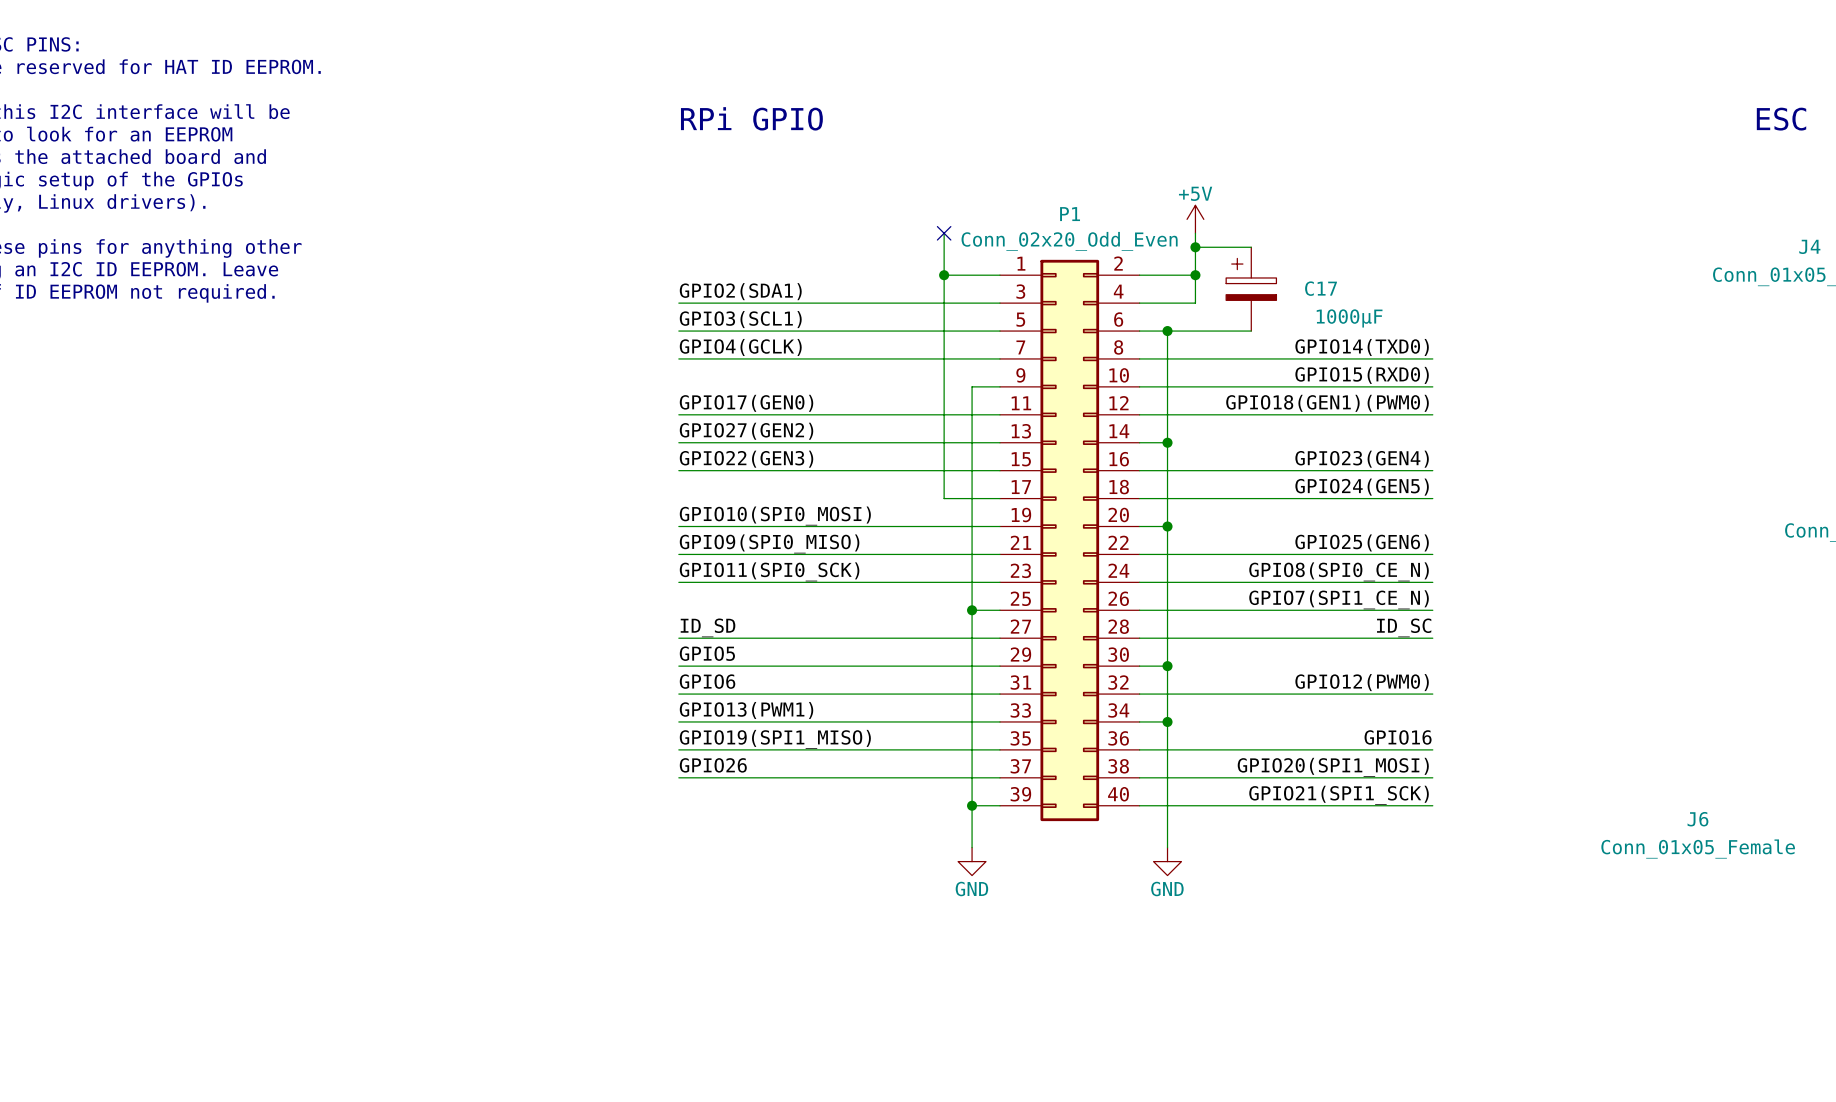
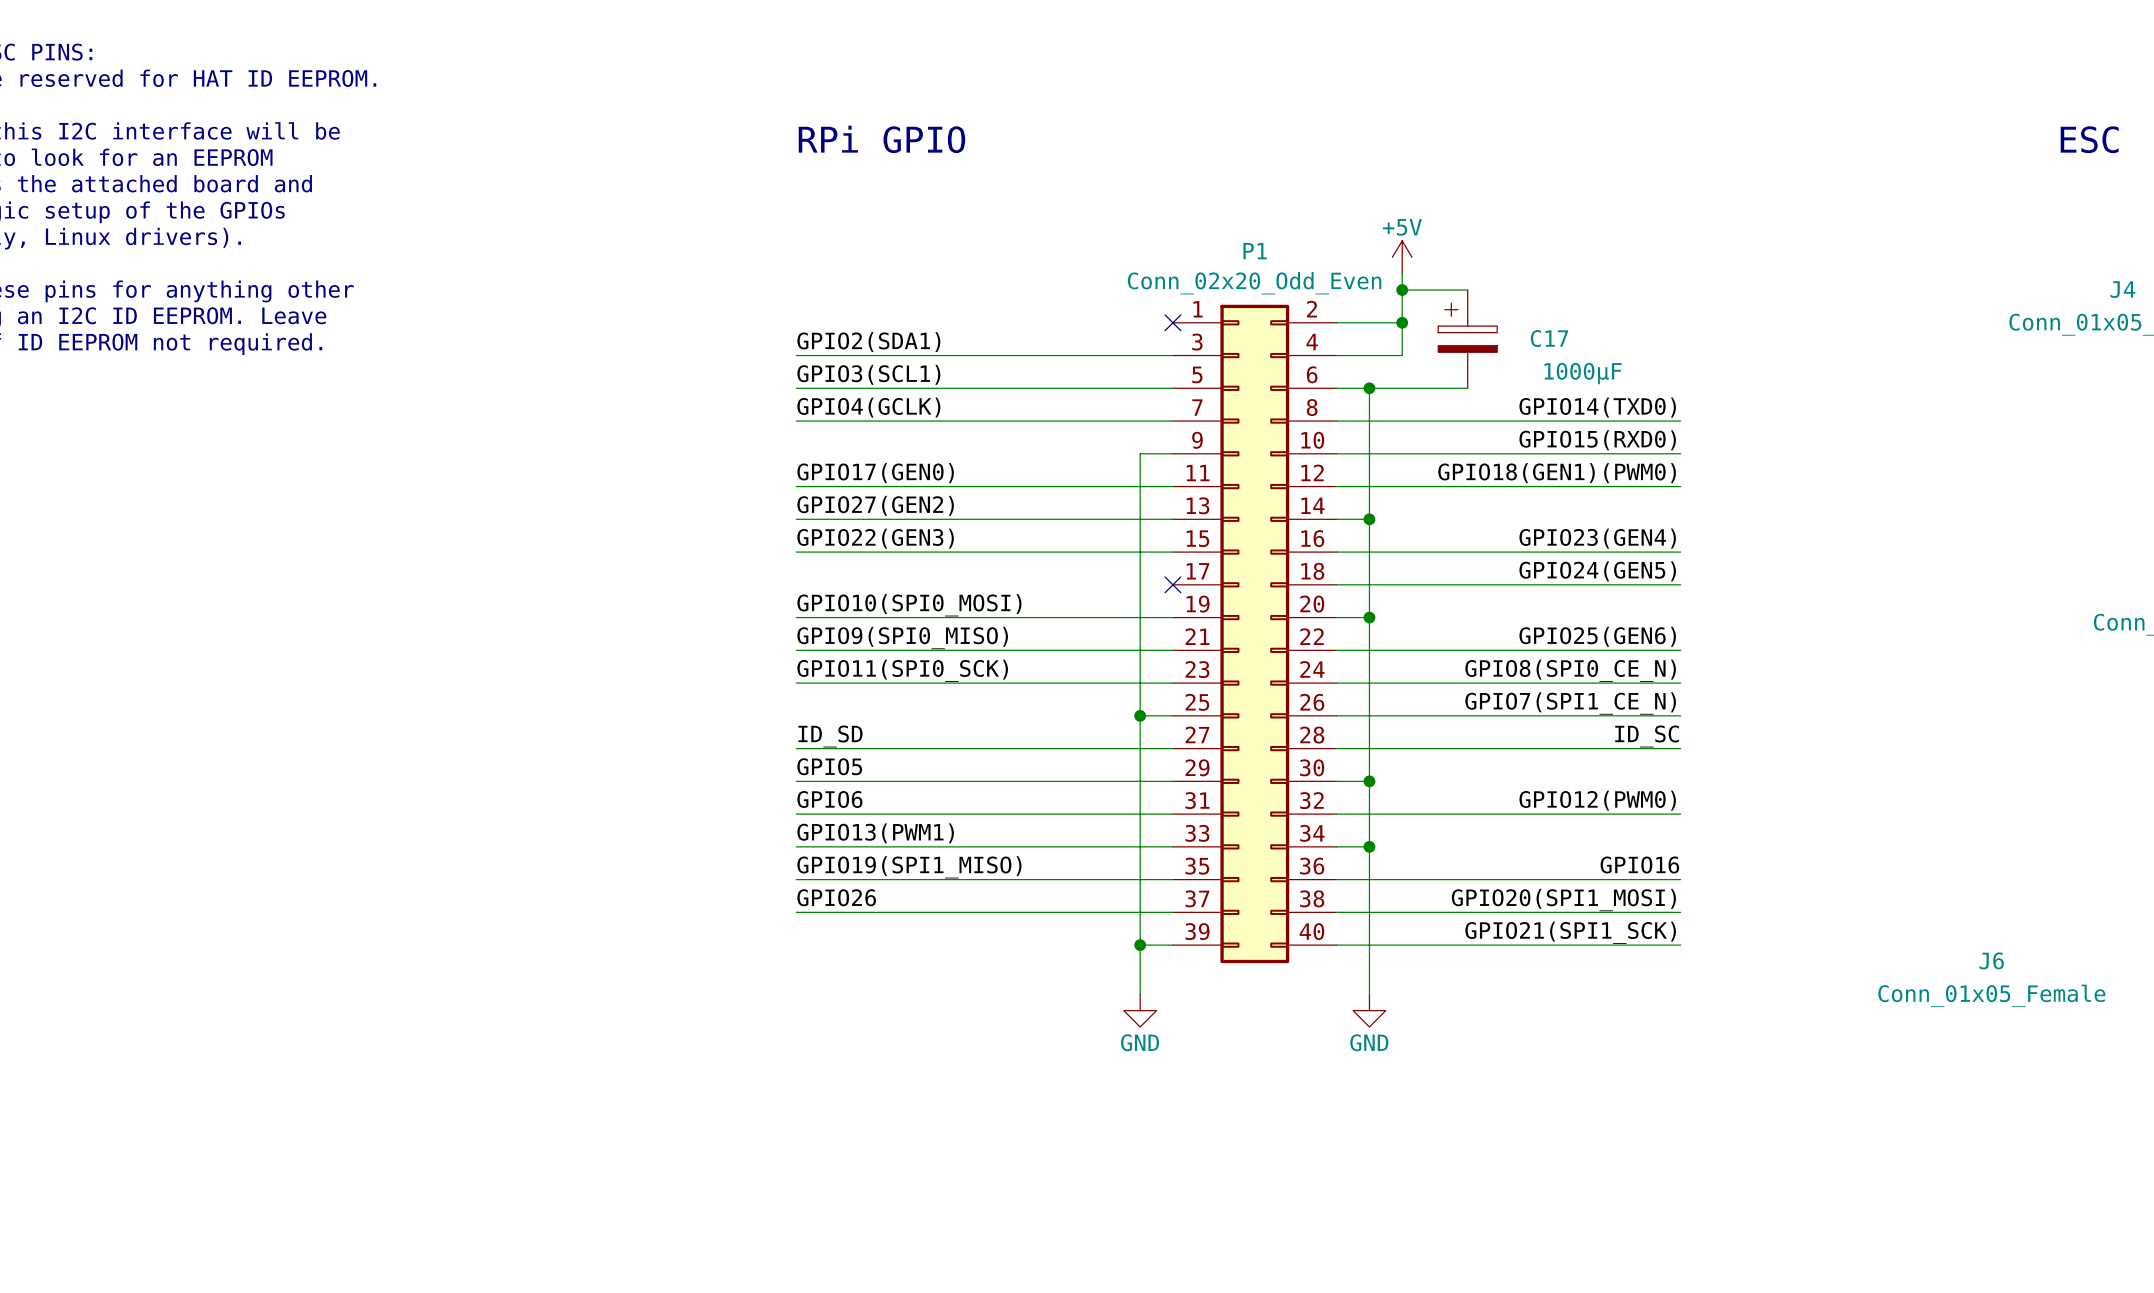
wire: (944, 233) (944, 498) (999, 498) -> none
no-connect mark: (944, 233) -> none
wire: (944, 275) (999, 275) -> none
junction: (944, 275) -> none
no-connect mark: none -> (1172, 322)
no-connect mark: none -> (1172, 584)

